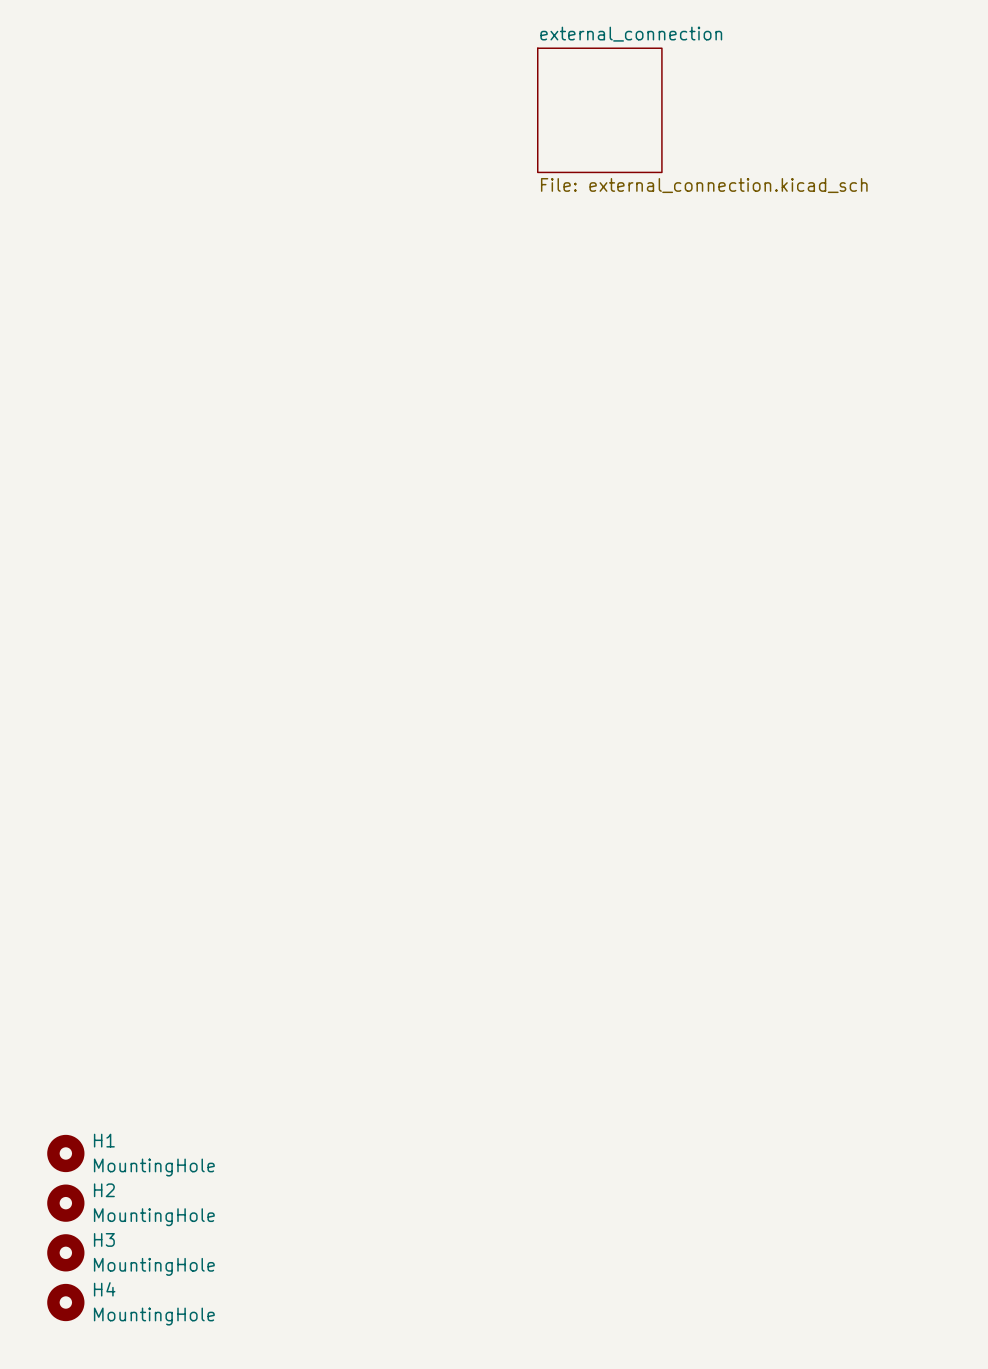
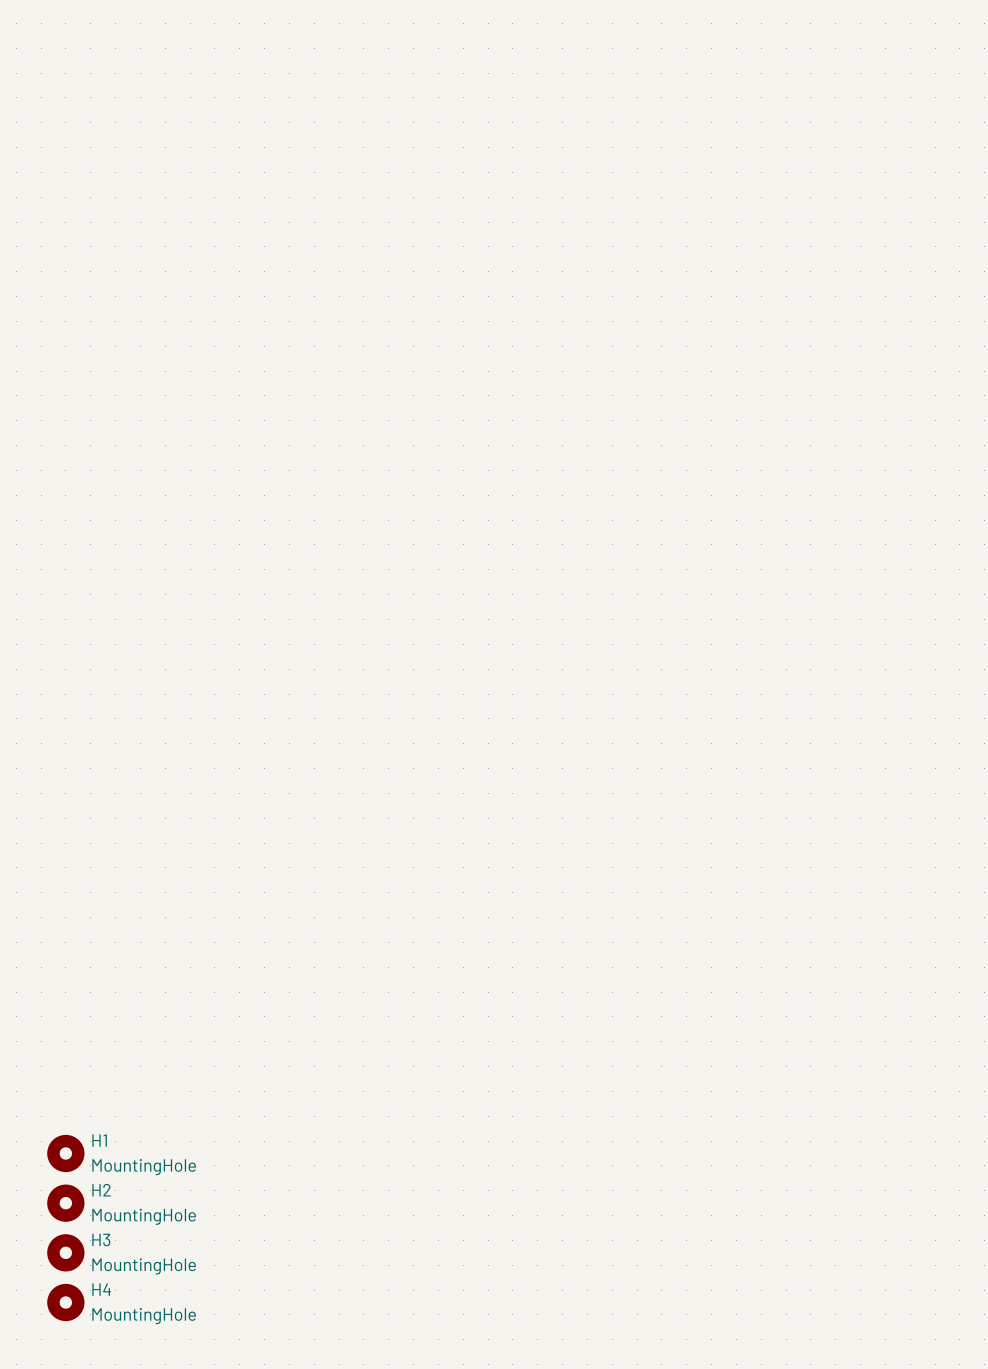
sheet external_connection: File: external_connection.kicad_sch (599, 110) -> none

